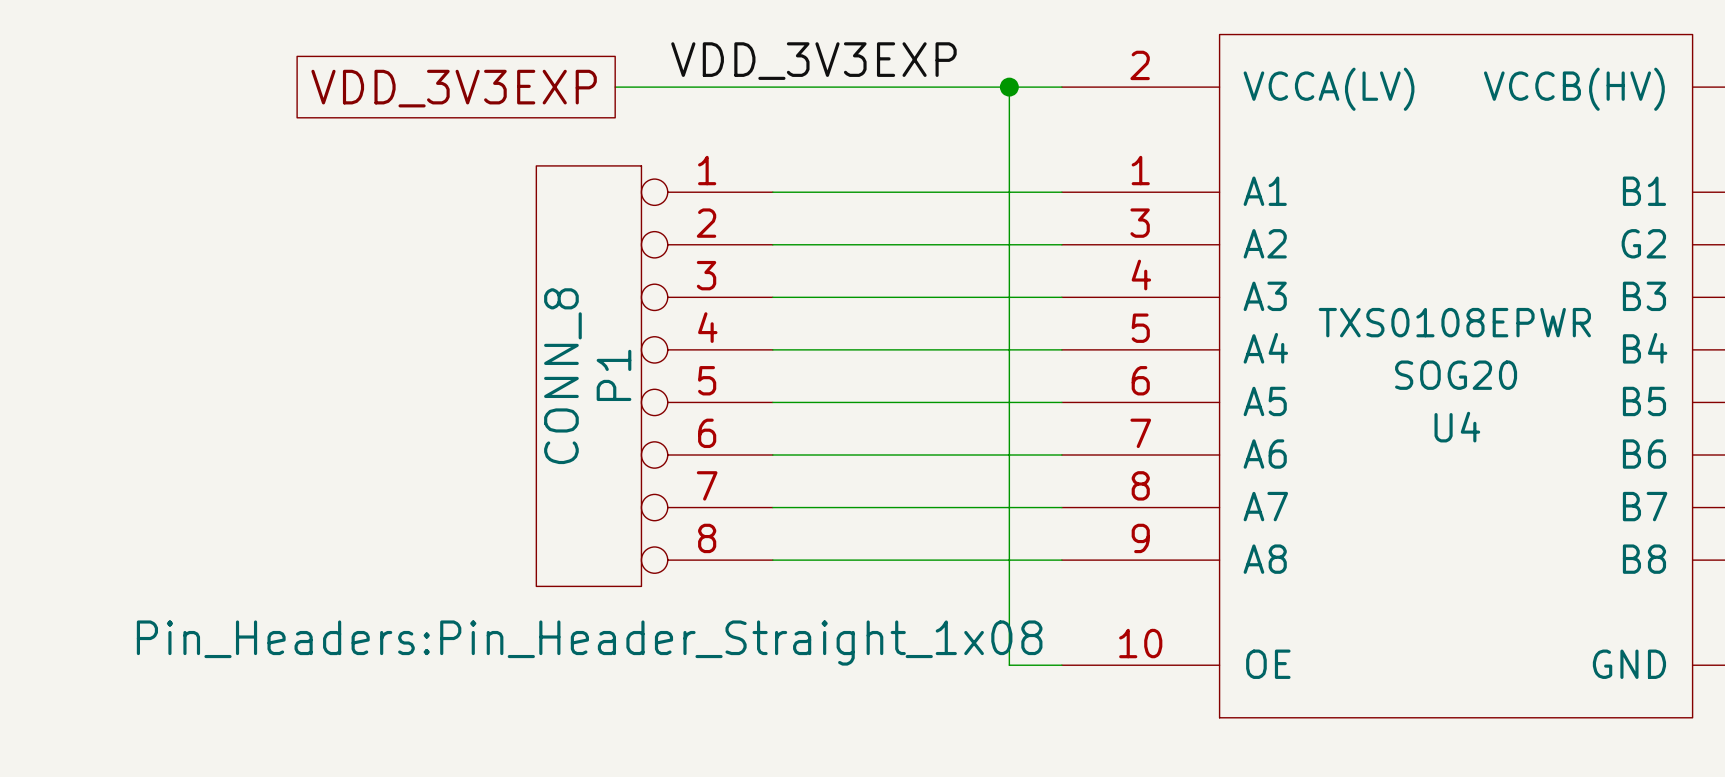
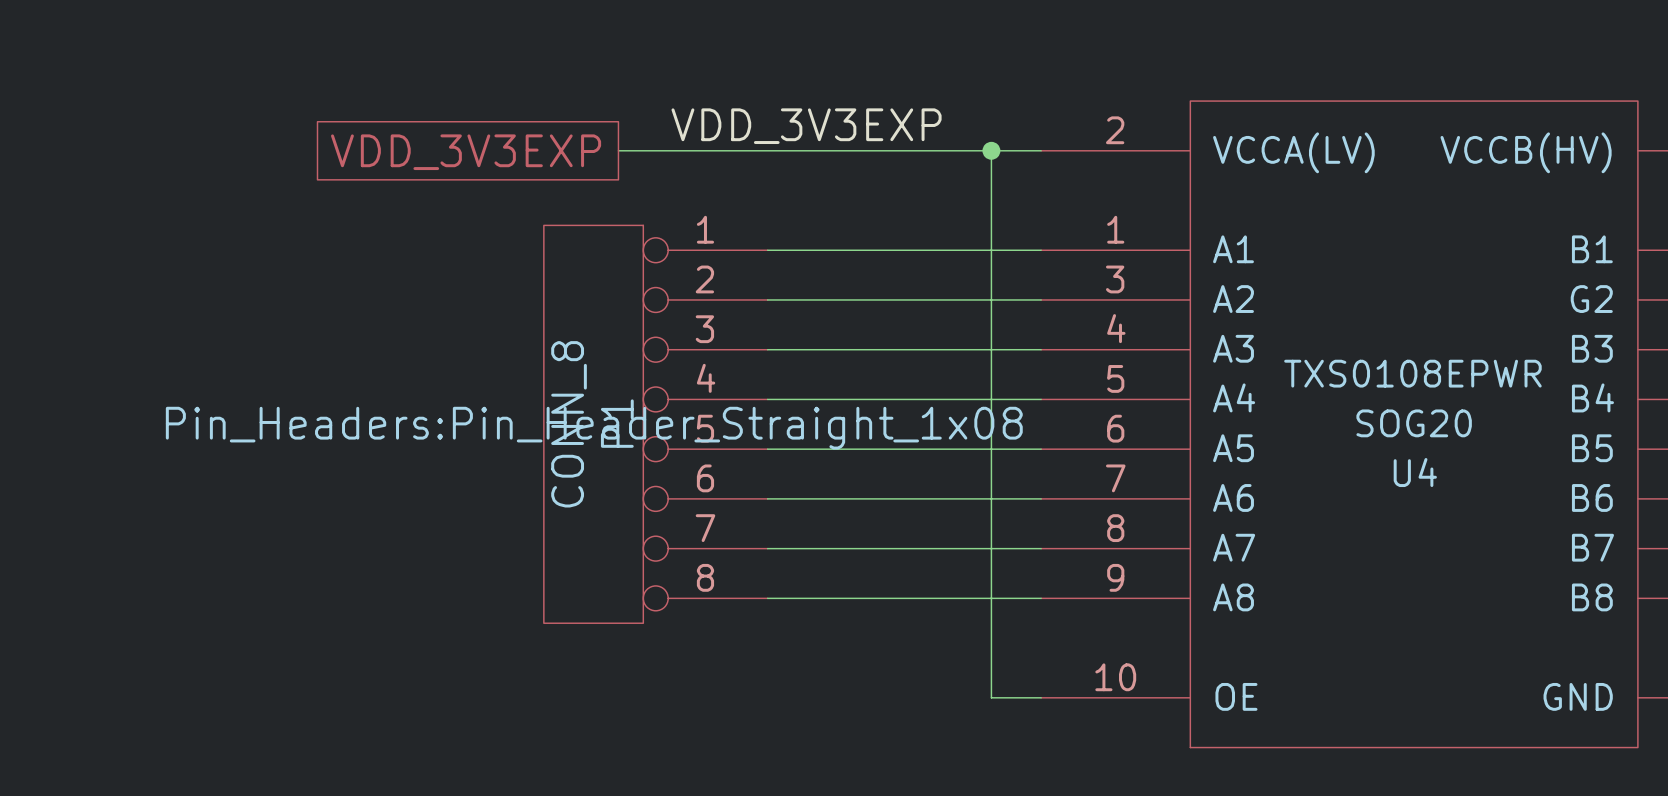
P1 text position: Pin_Headers:Pin_Header_Straight_1x08 (589, 643) -> Pin_Headers:Pin_Header_Straight_1x08 (594, 428)

